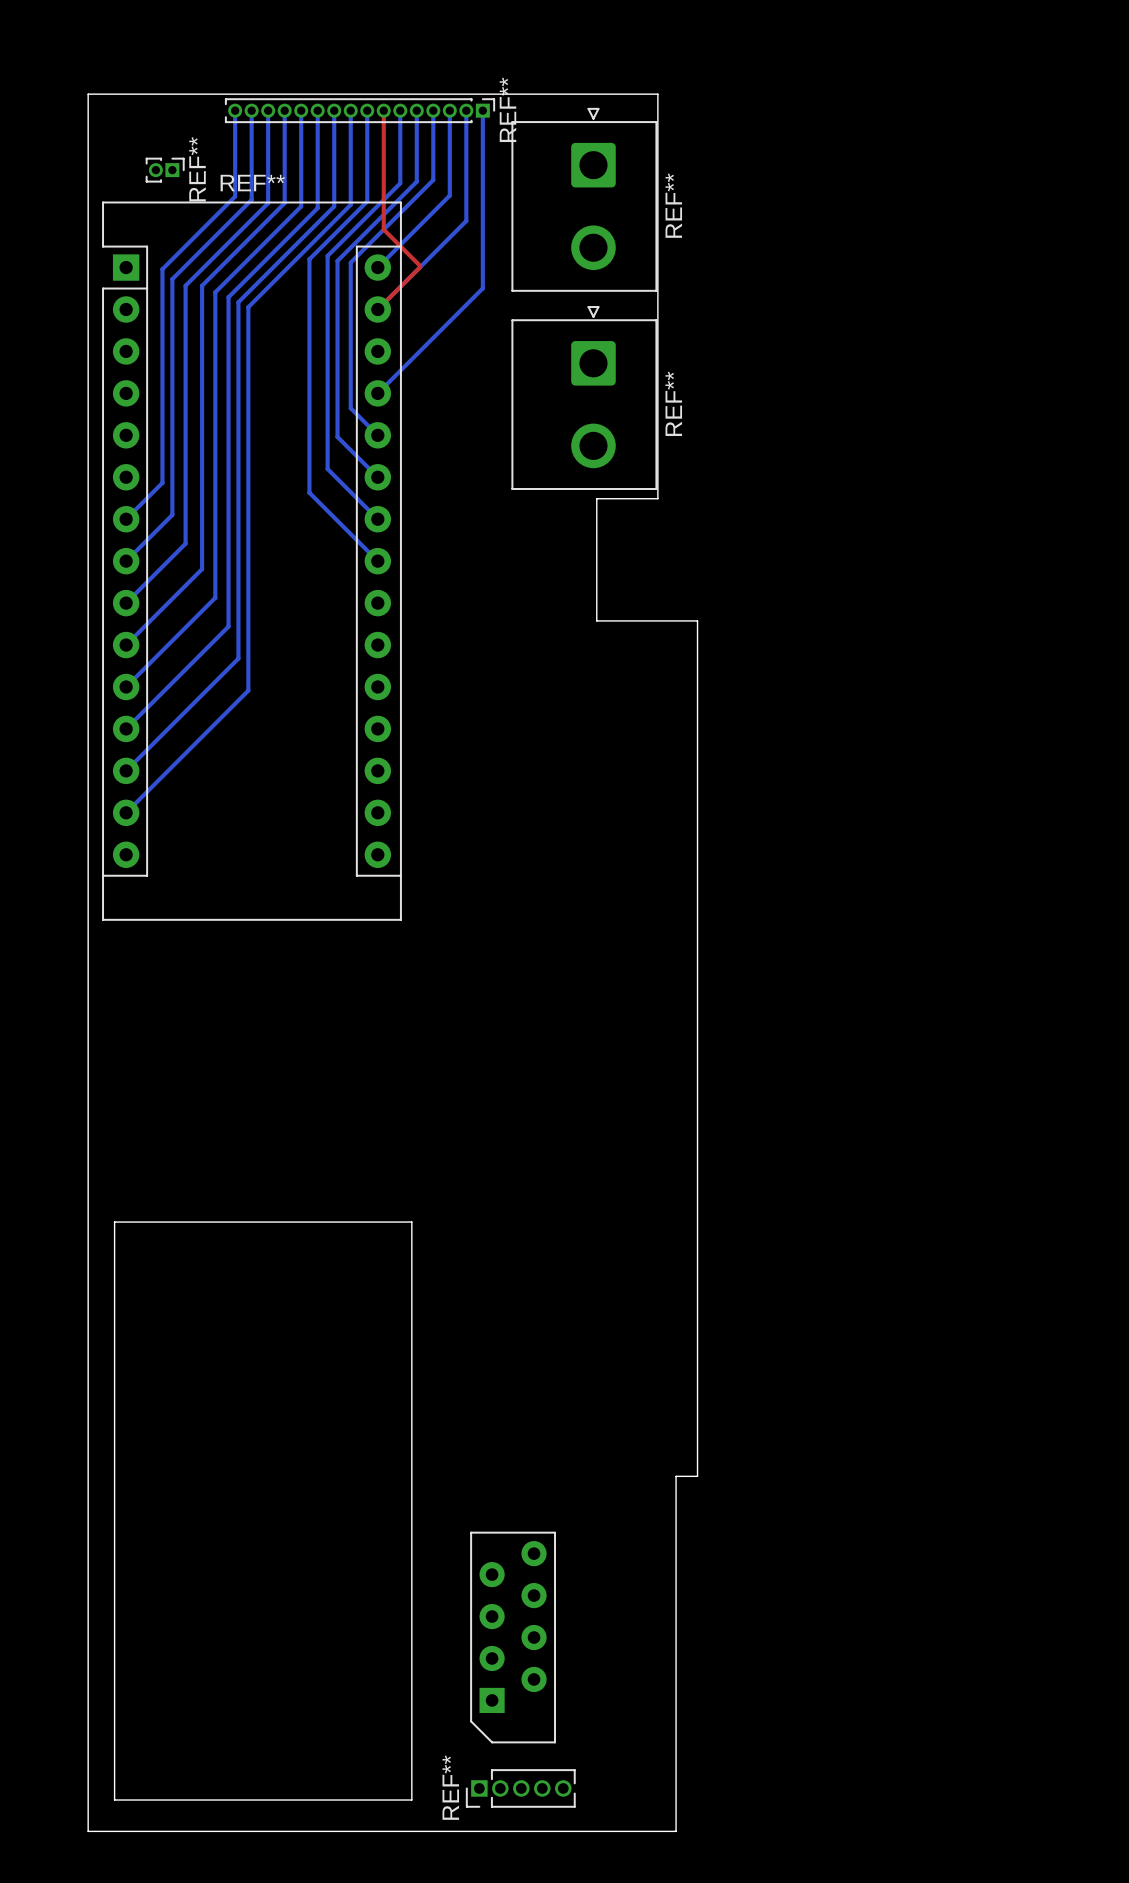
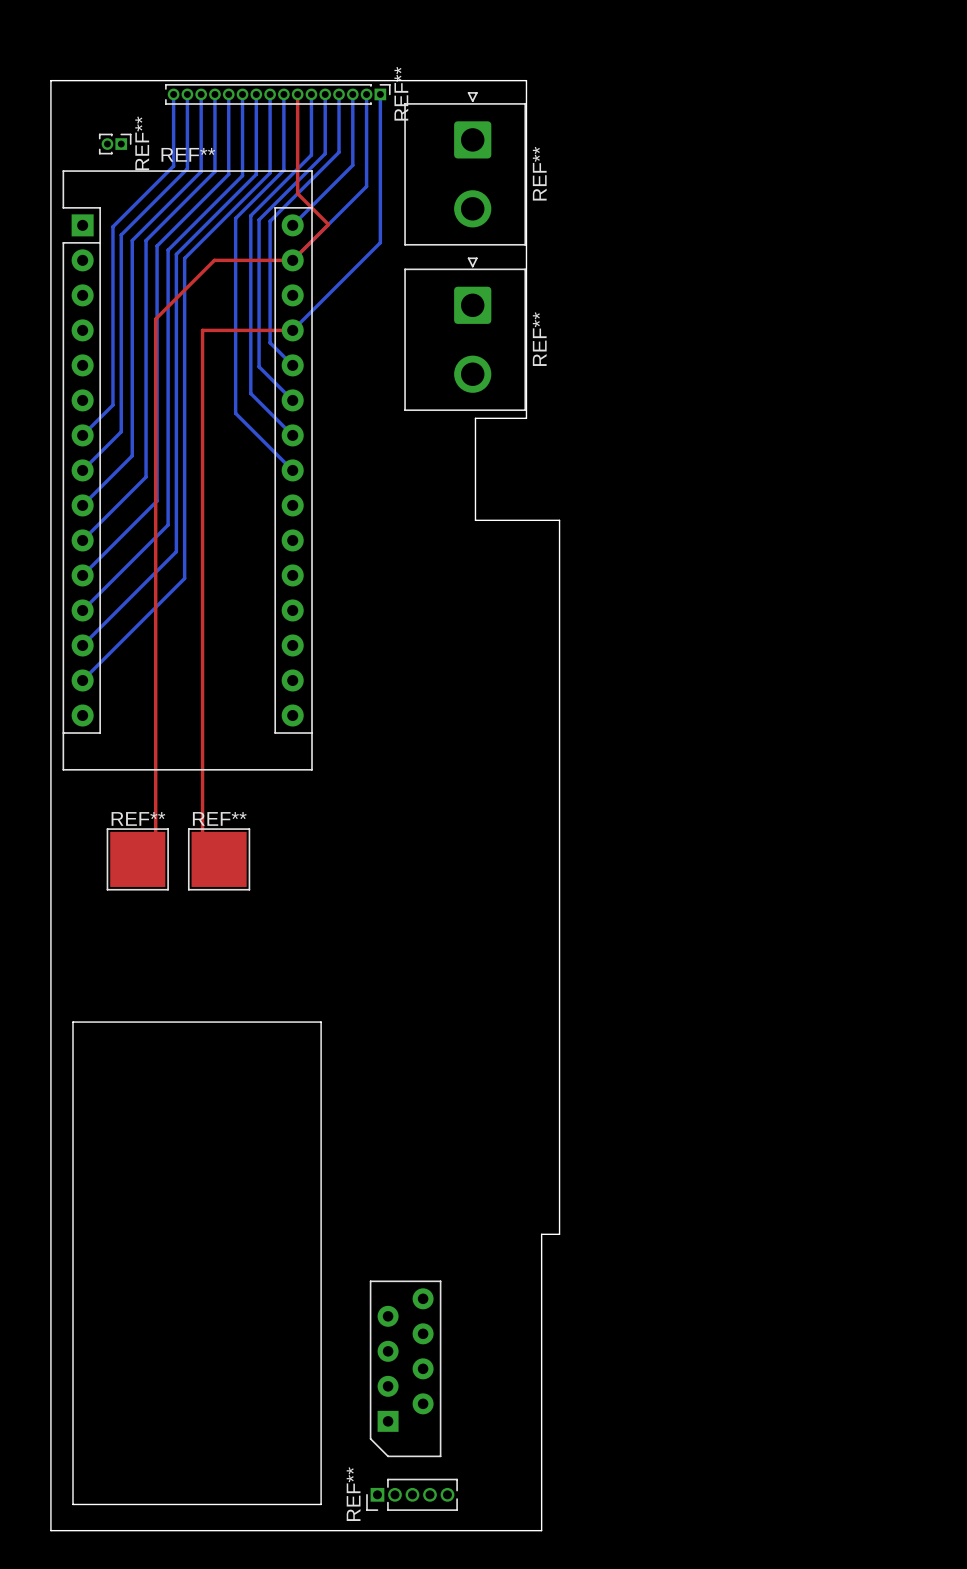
top track: none -> (292, 260) (214, 260) (155, 319) (155, 859)
top track: none -> (292, 330) (202, 330) (202, 860)
REF**: none -> (137, 859)
REF**: none -> (219, 859)

